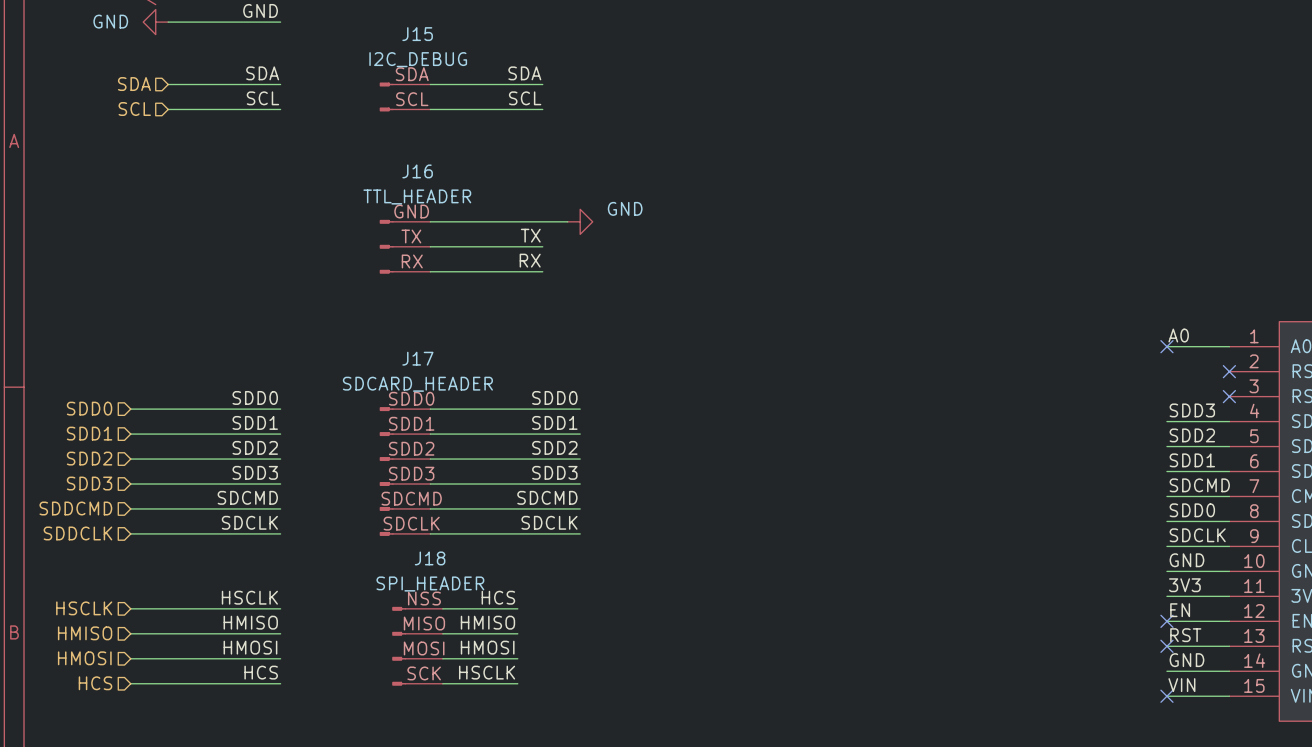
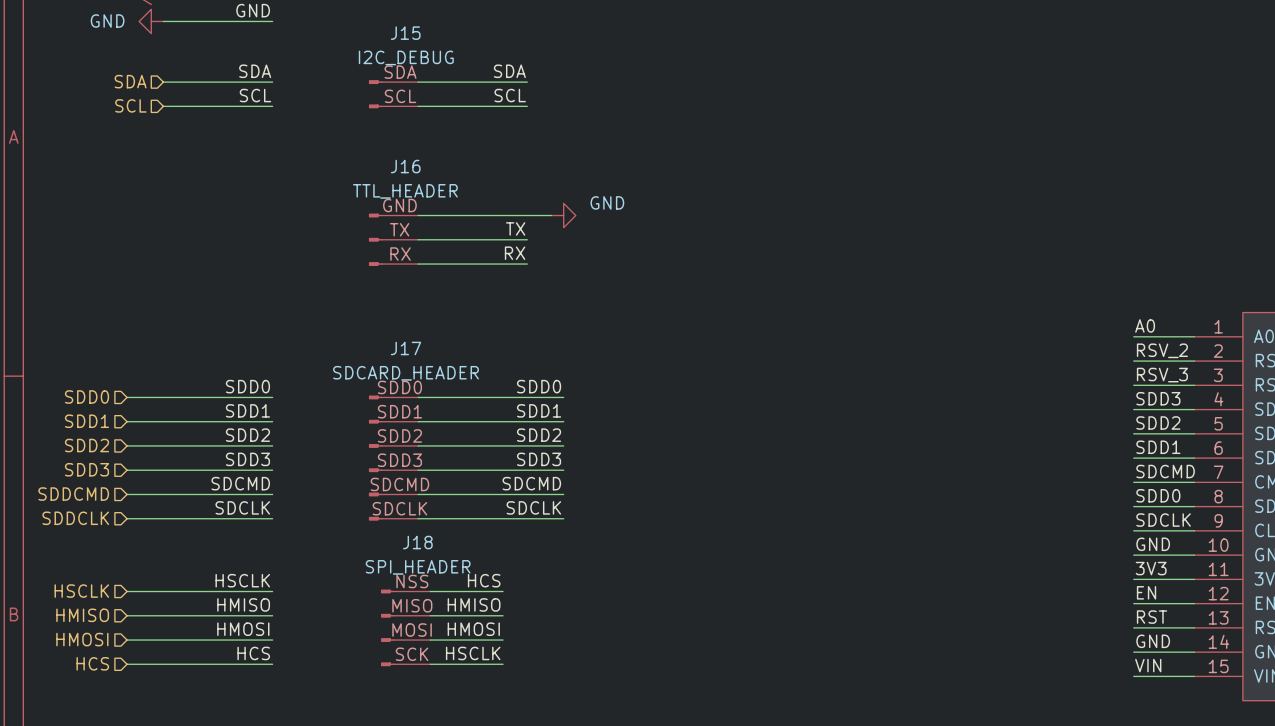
no-connect mark: (1166, 346) -> none
label: none -> RSV_2 (1162, 350)
wire: none -> (1133, 361) (1194, 361)
no-connect mark: (1229, 371) -> none
label: none -> RSV_3 (1162, 375)
wire: none -> (1133, 385) (1194, 385)
no-connect mark: (1229, 396) -> none
no-connect mark: (1166, 621) -> none
no-connect mark: (1166, 646) -> none
no-connect mark: (1166, 696) -> none

